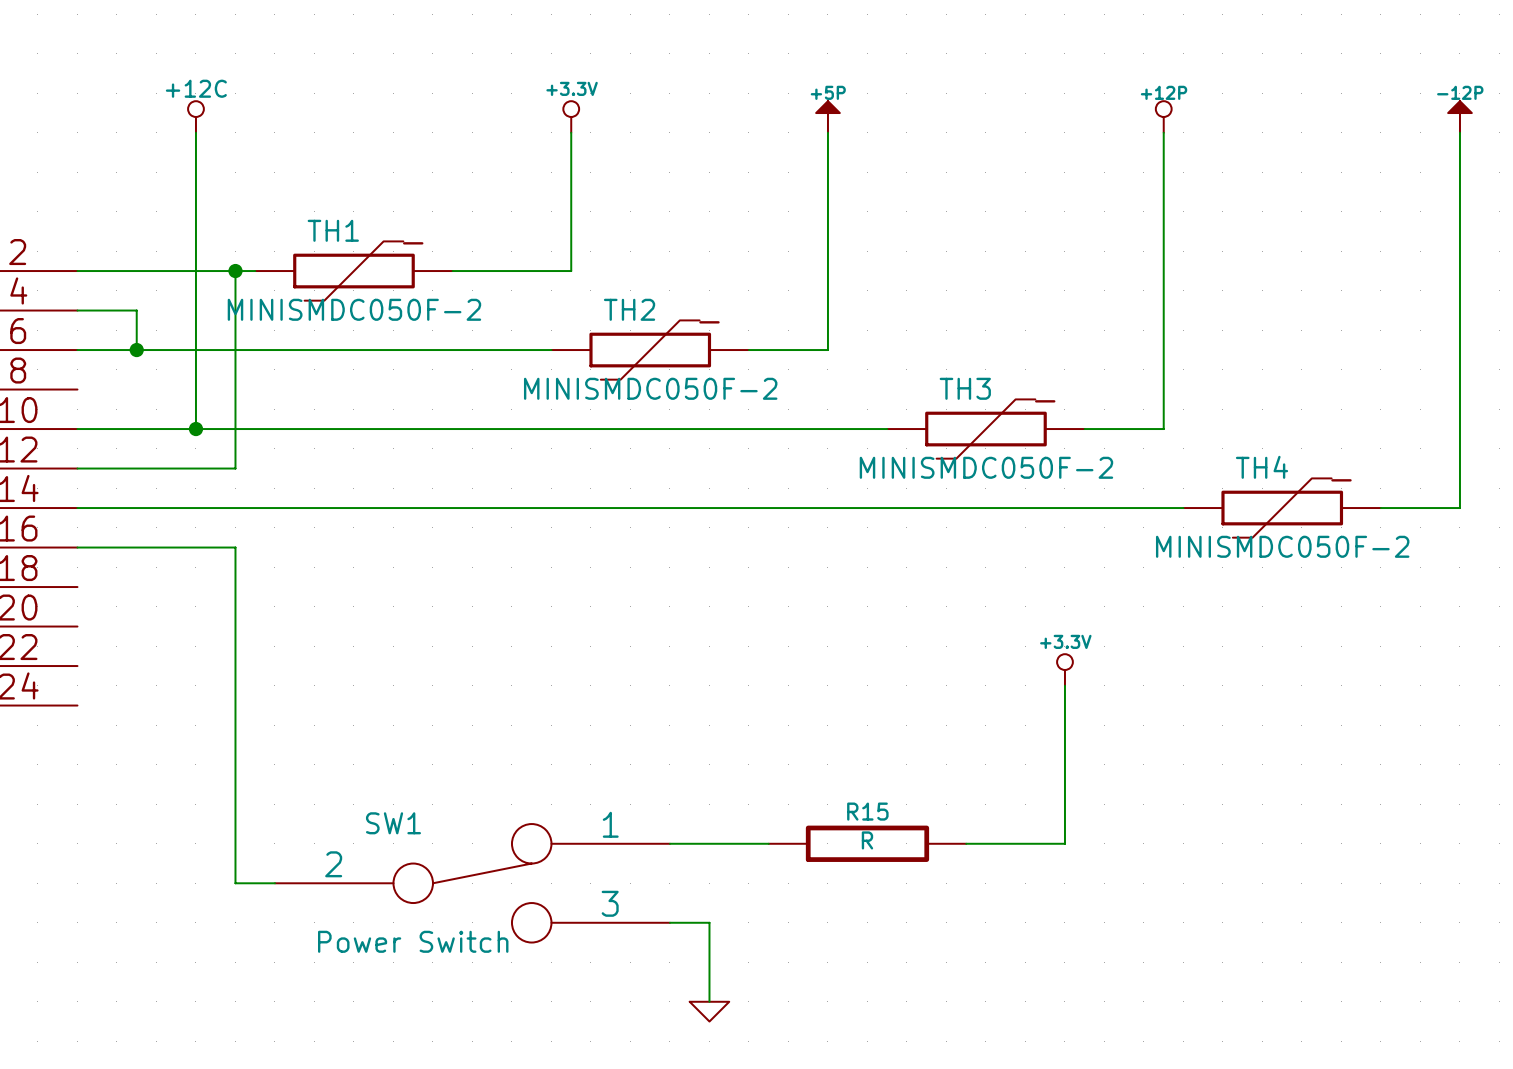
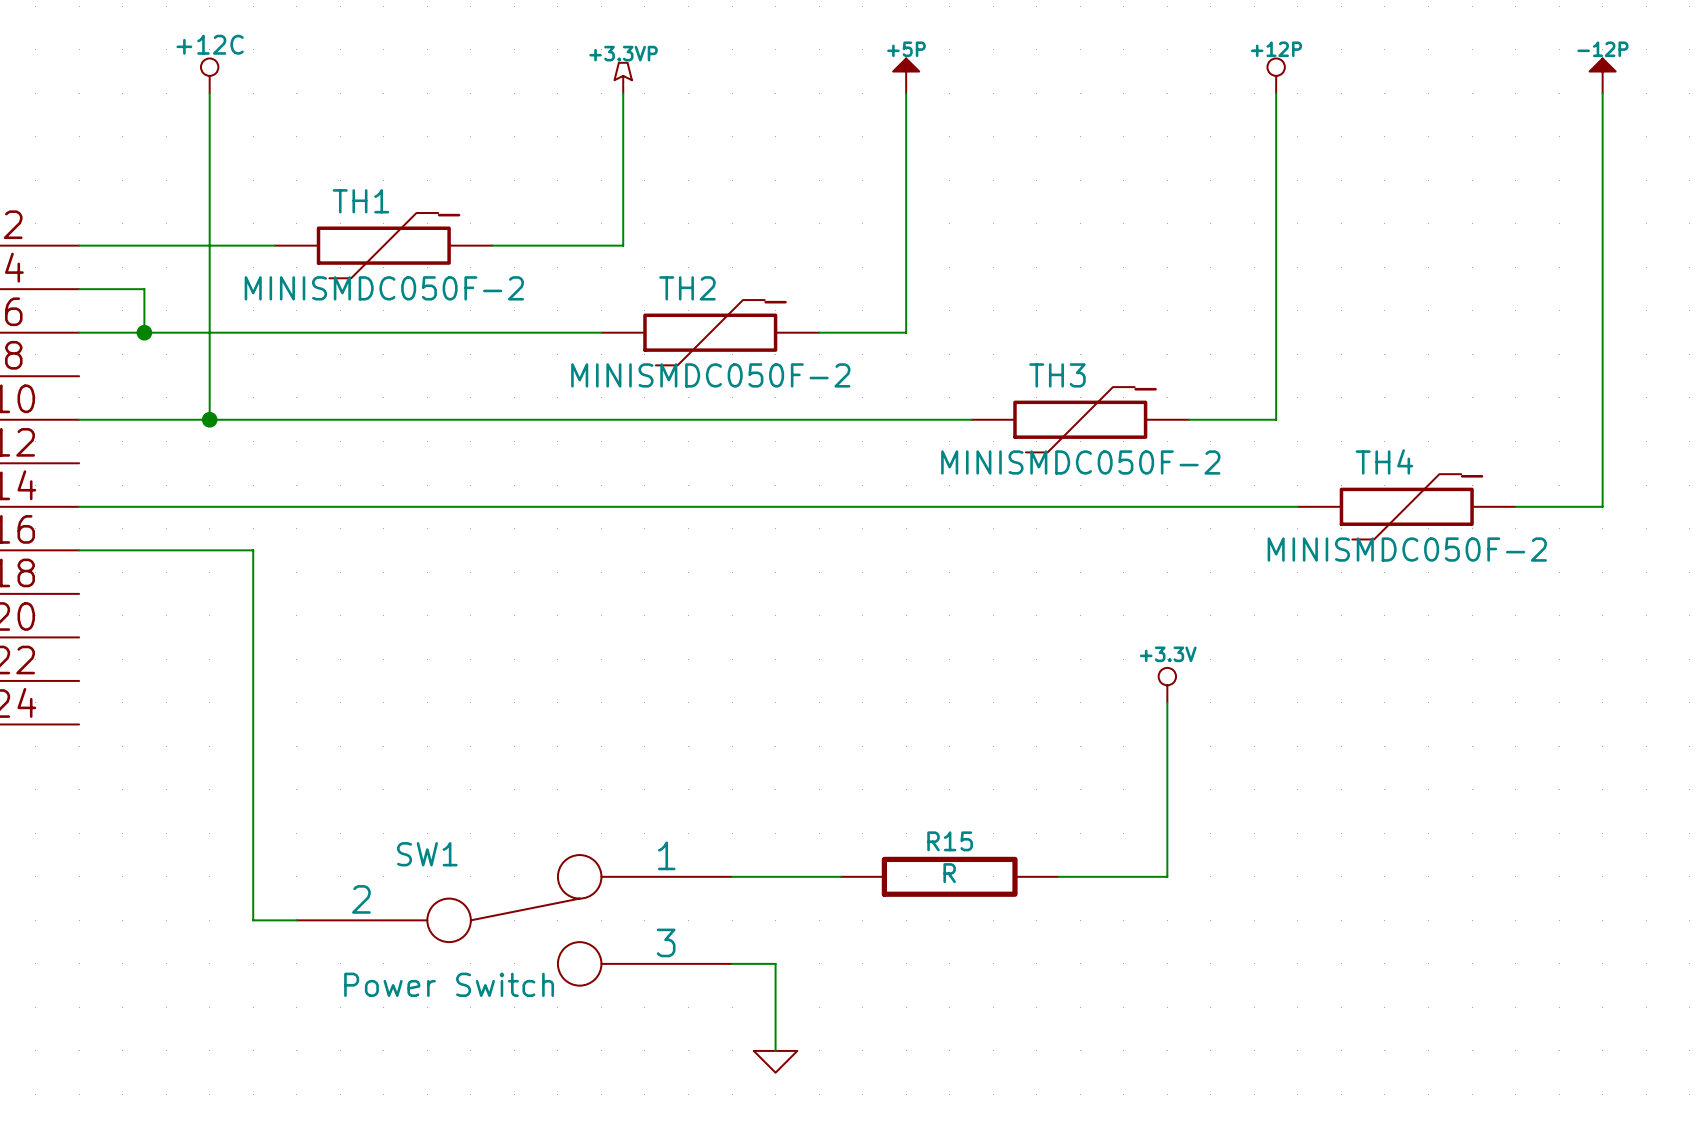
power symbol: +3.3V (571, 116) -> +3.3VP (623, 78)
wire: (235, 271) (235, 468) (77, 468) -> none
junction: (235, 271) -> none

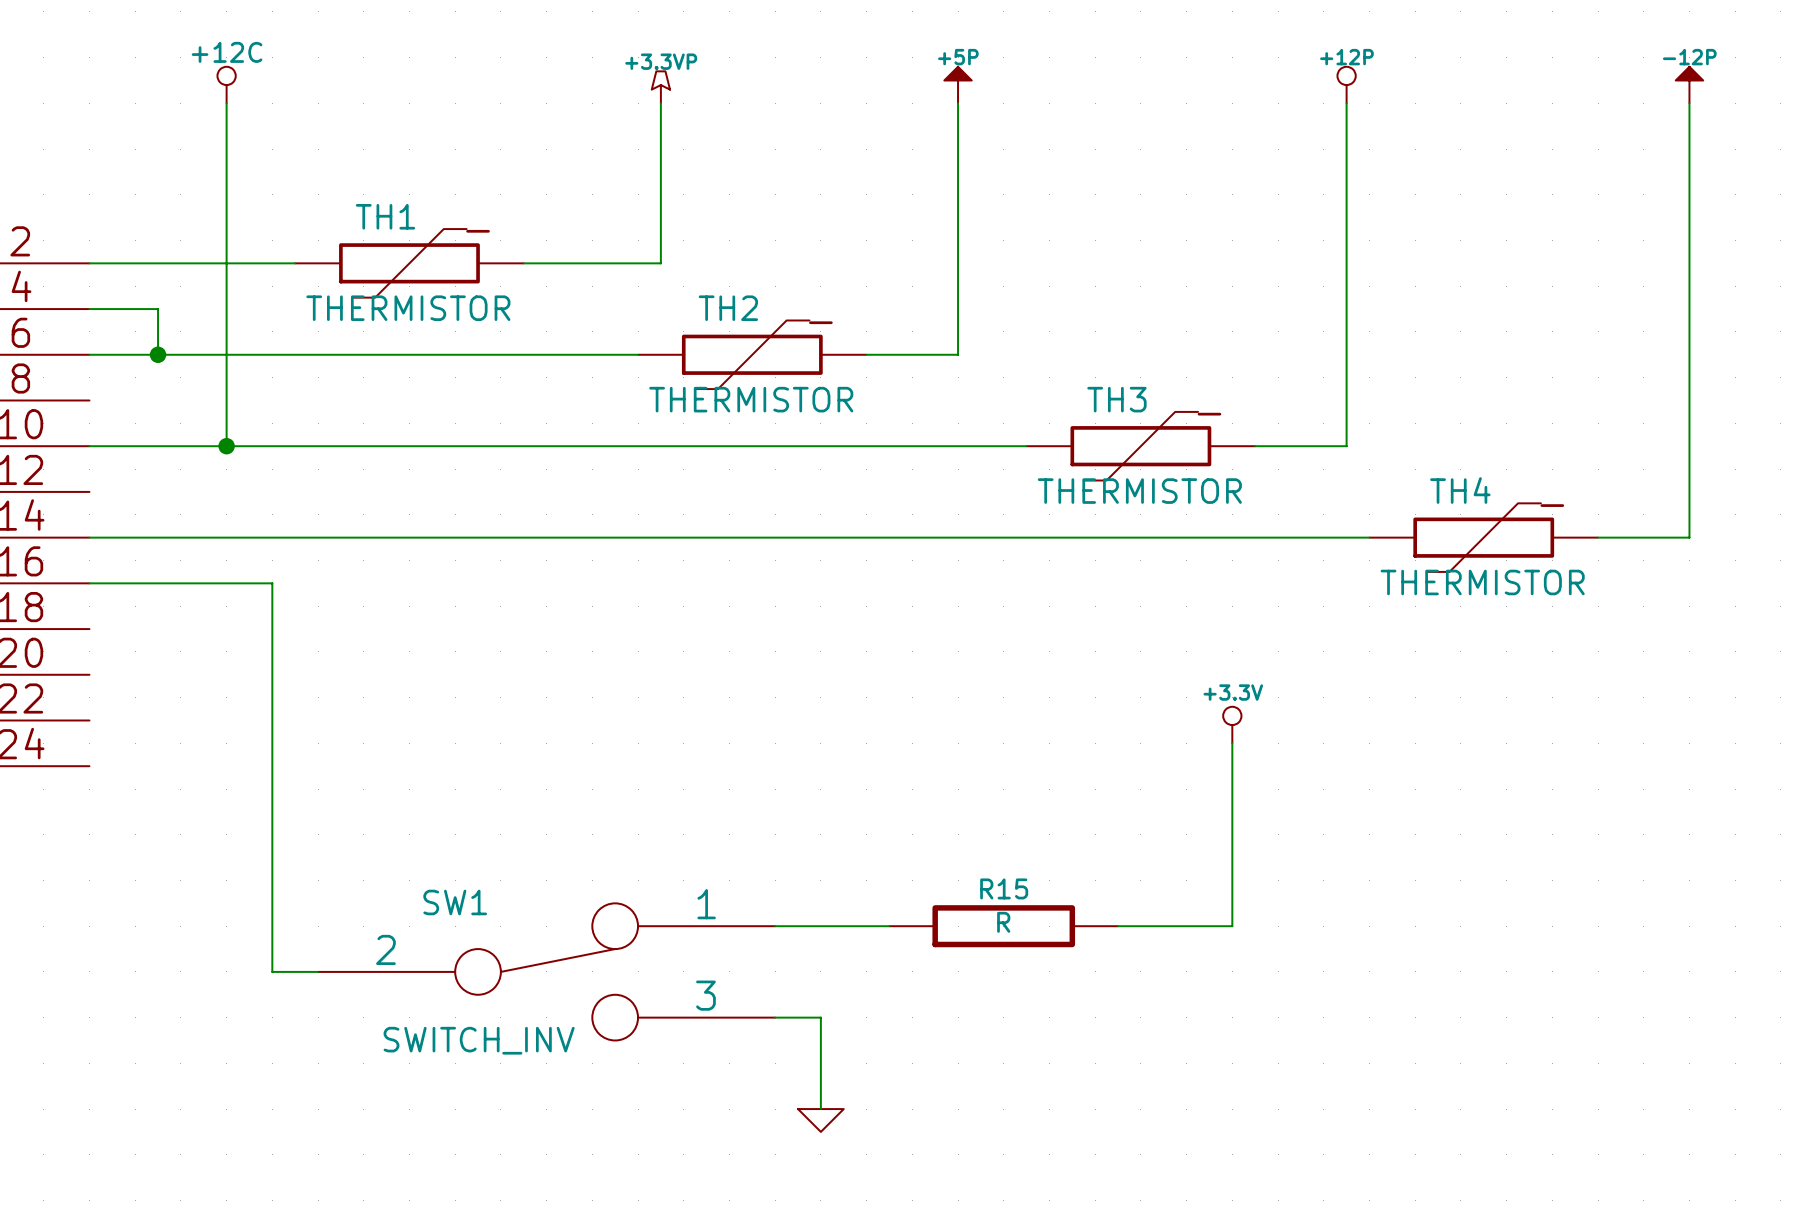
TH1 value: MINISMDC050F-2 (384, 288) -> THERMISTOR (408, 308)
TH2 value: MINISMDC050F-2 (710, 375) -> THERMISTOR (751, 399)
TH3 value: MINISMDC050F-2 (1080, 462) -> THERMISTOR (1139, 491)
TH4 value: MINISMDC050F-2 (1407, 549) -> THERMISTOR (1482, 582)
SW1 value: Power Switch (449, 984) -> SWITCH_INV (479, 1040)

